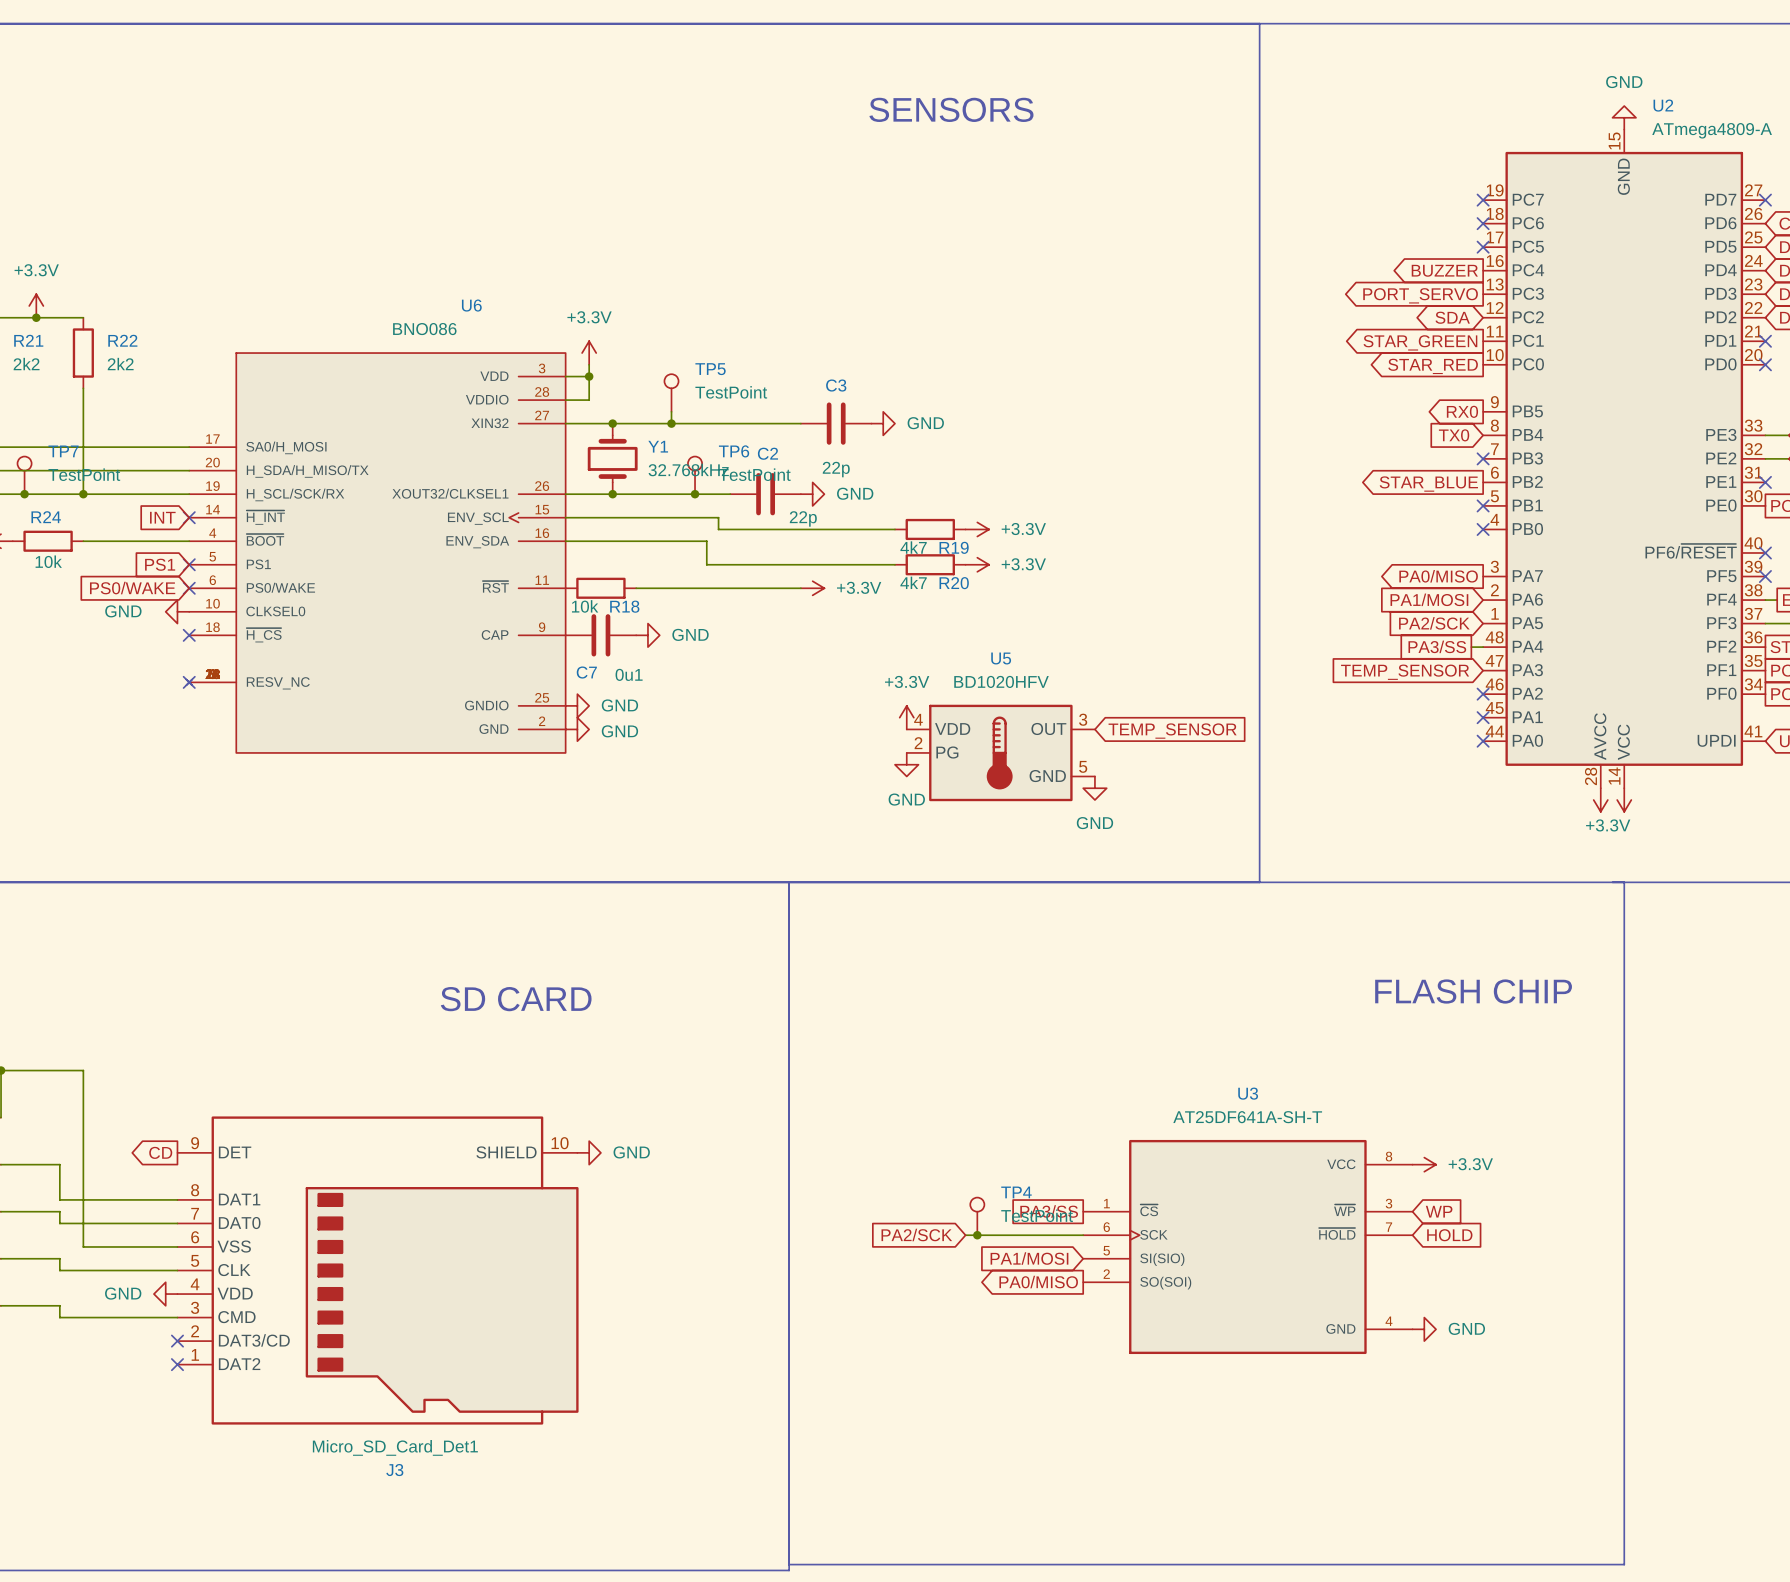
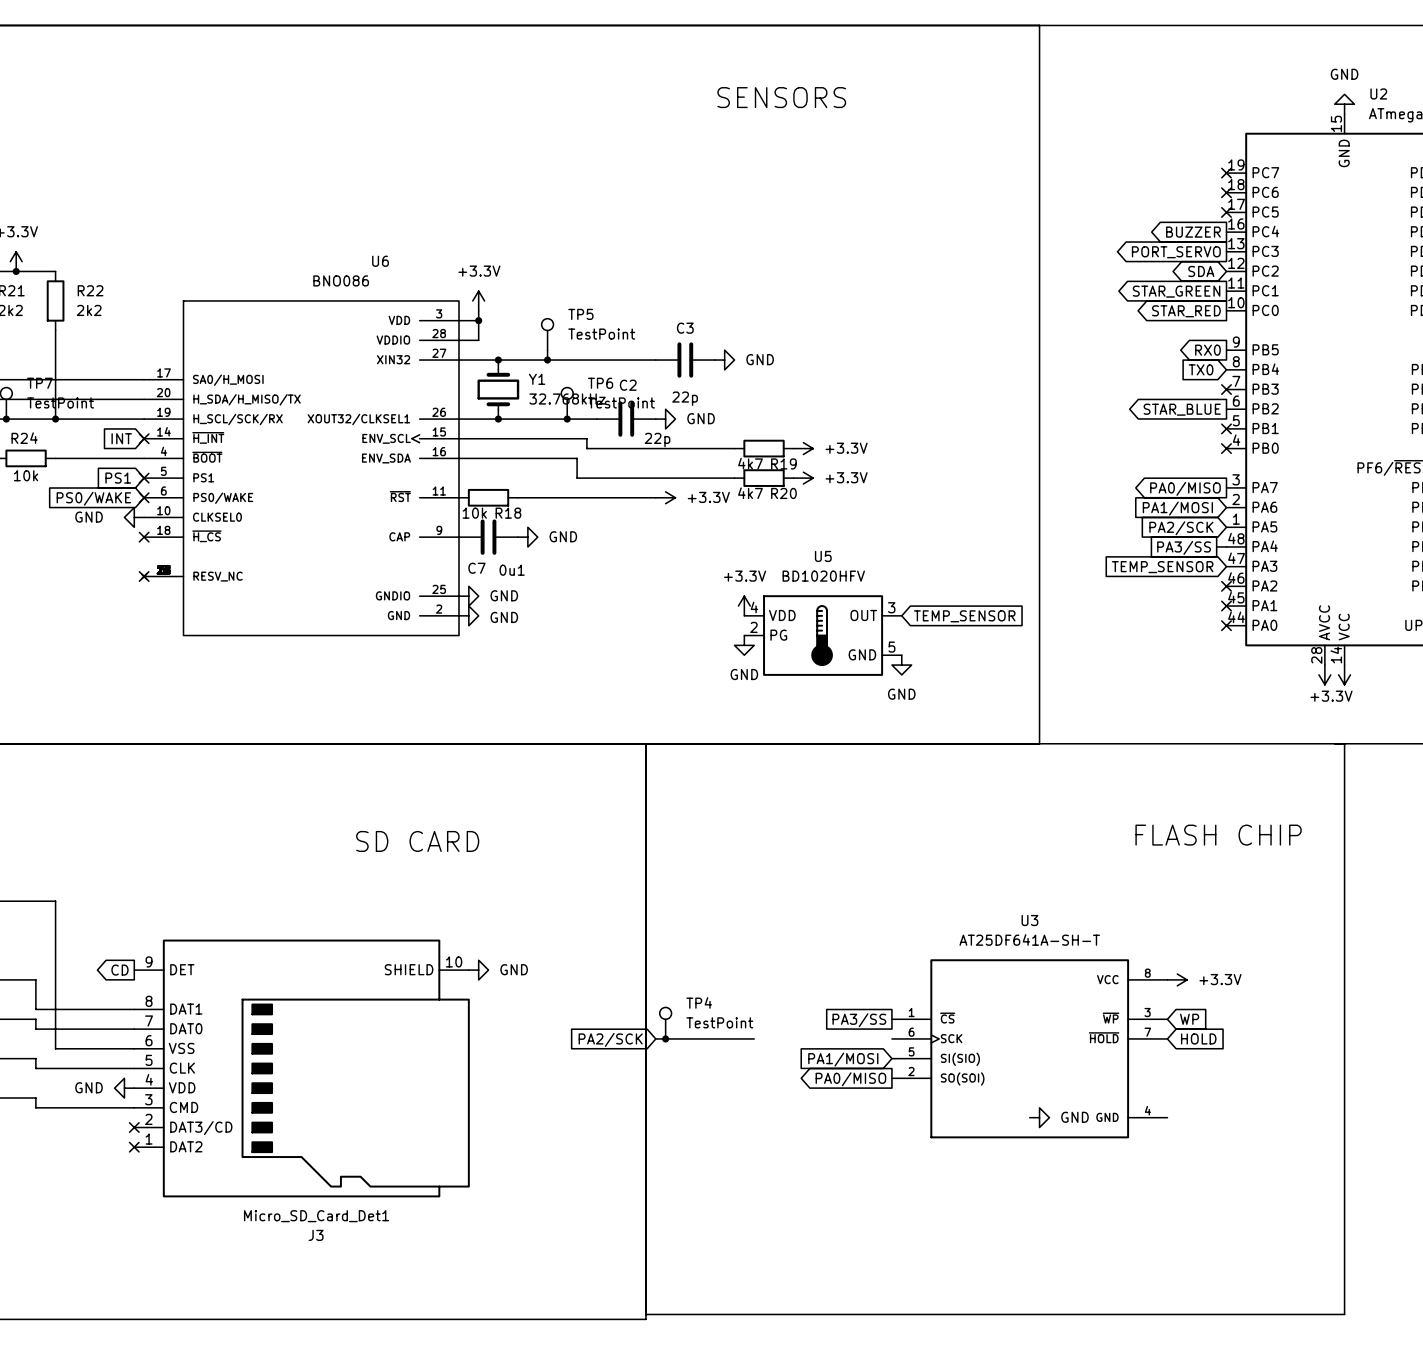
TP4 position: (977, 1216) -> (665, 1023)
global label position: PA2/SCK (916, 1234) -> PA2/SCK (610, 1039)
junction: none -> (665, 1038)
wire: (965, 1235) (1083, 1235) -> (655, 1038) (754, 1038)
junction: (977, 1235) -> none
power symbol position: GND (1424, 1329) -> GND (1039, 1117)

